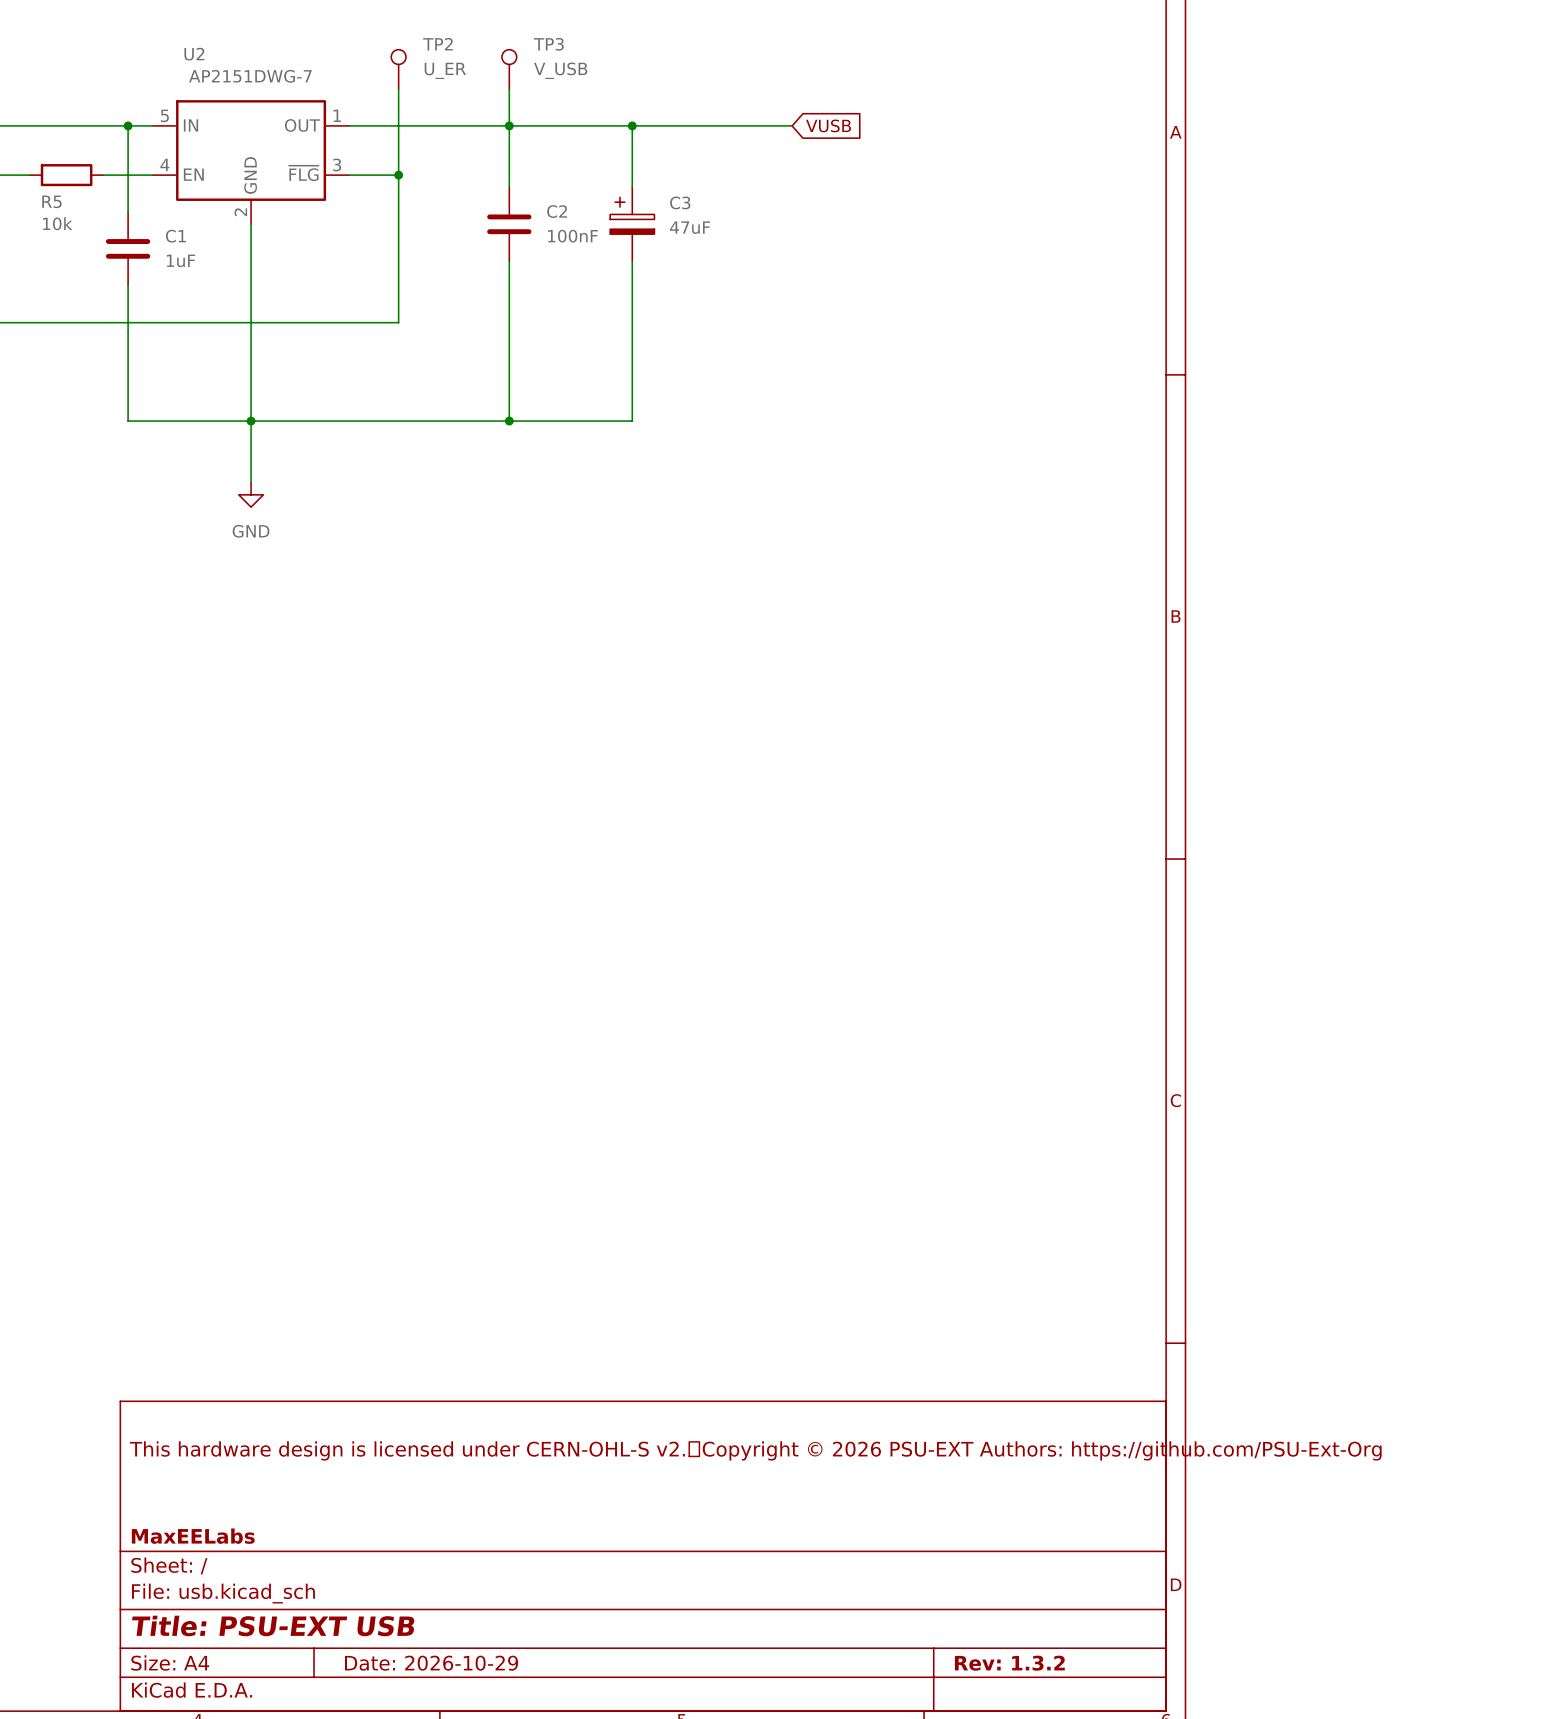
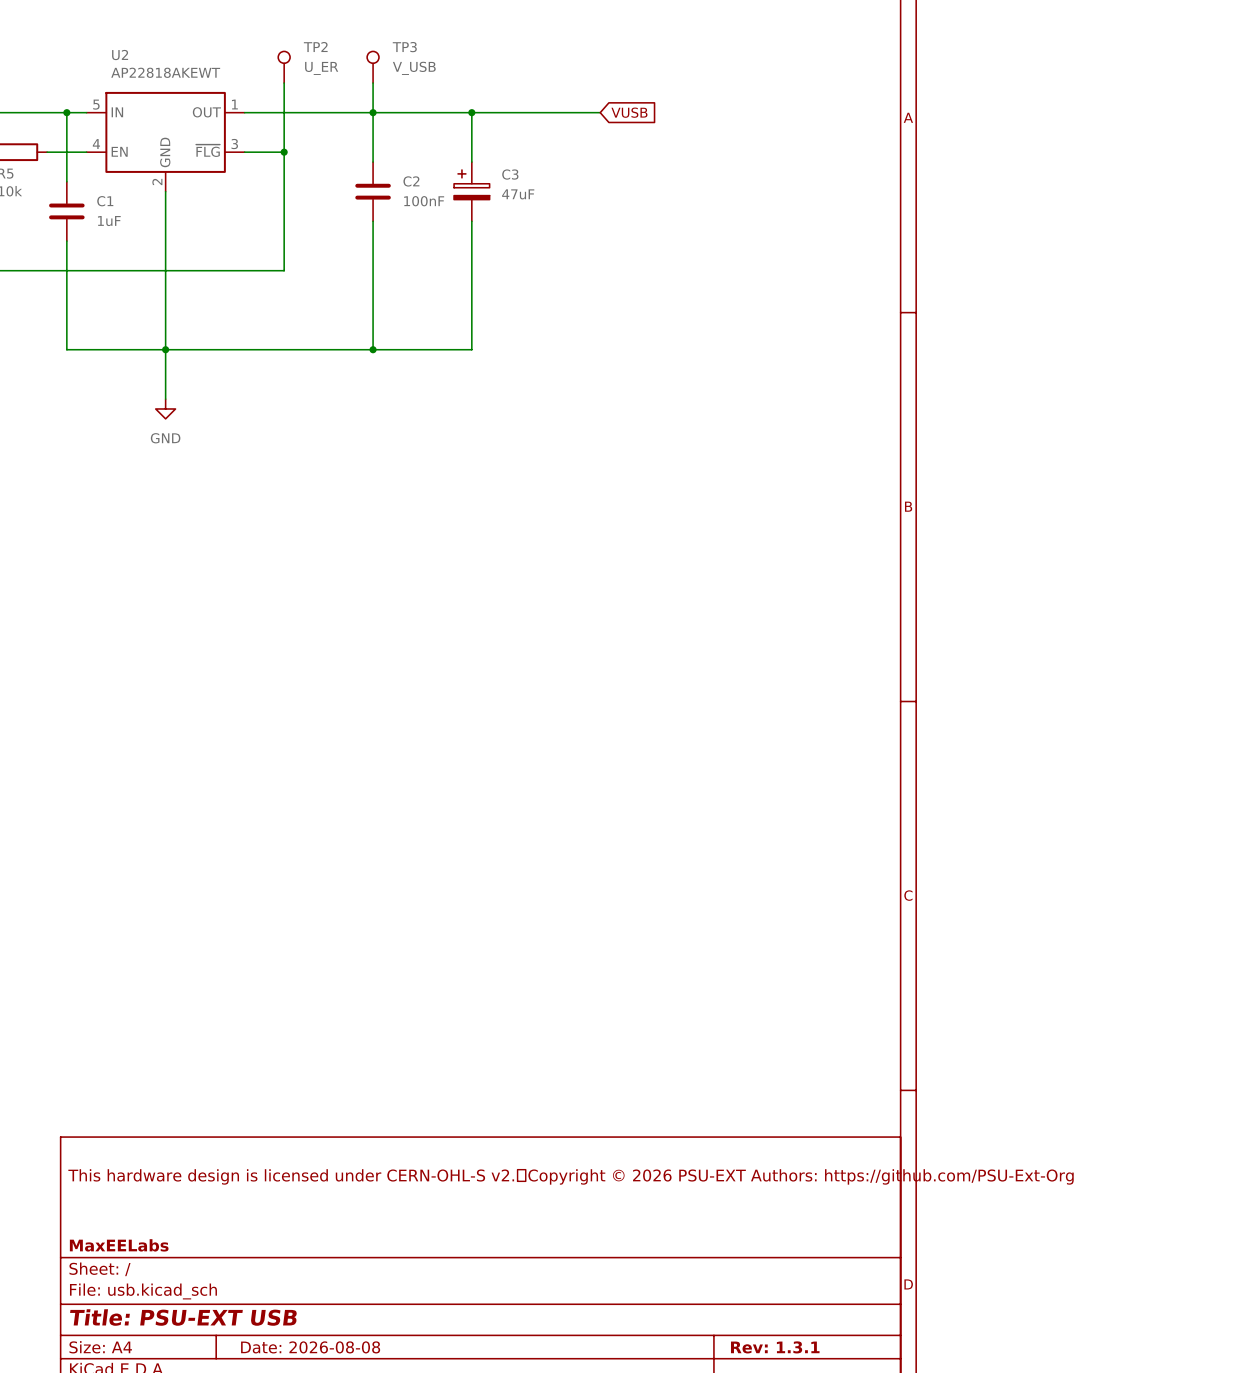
U2 value: AP2151DWG-7 (250, 76) -> AP22818AKEWT (165, 72)
title block: Date: 2026-10-29 (431, 1663) -> Date: 2026-08-08 (310, 1347)
title block: Rev: 1.3.2 (1009, 1663) -> Rev: 1.3.1 (775, 1347)

